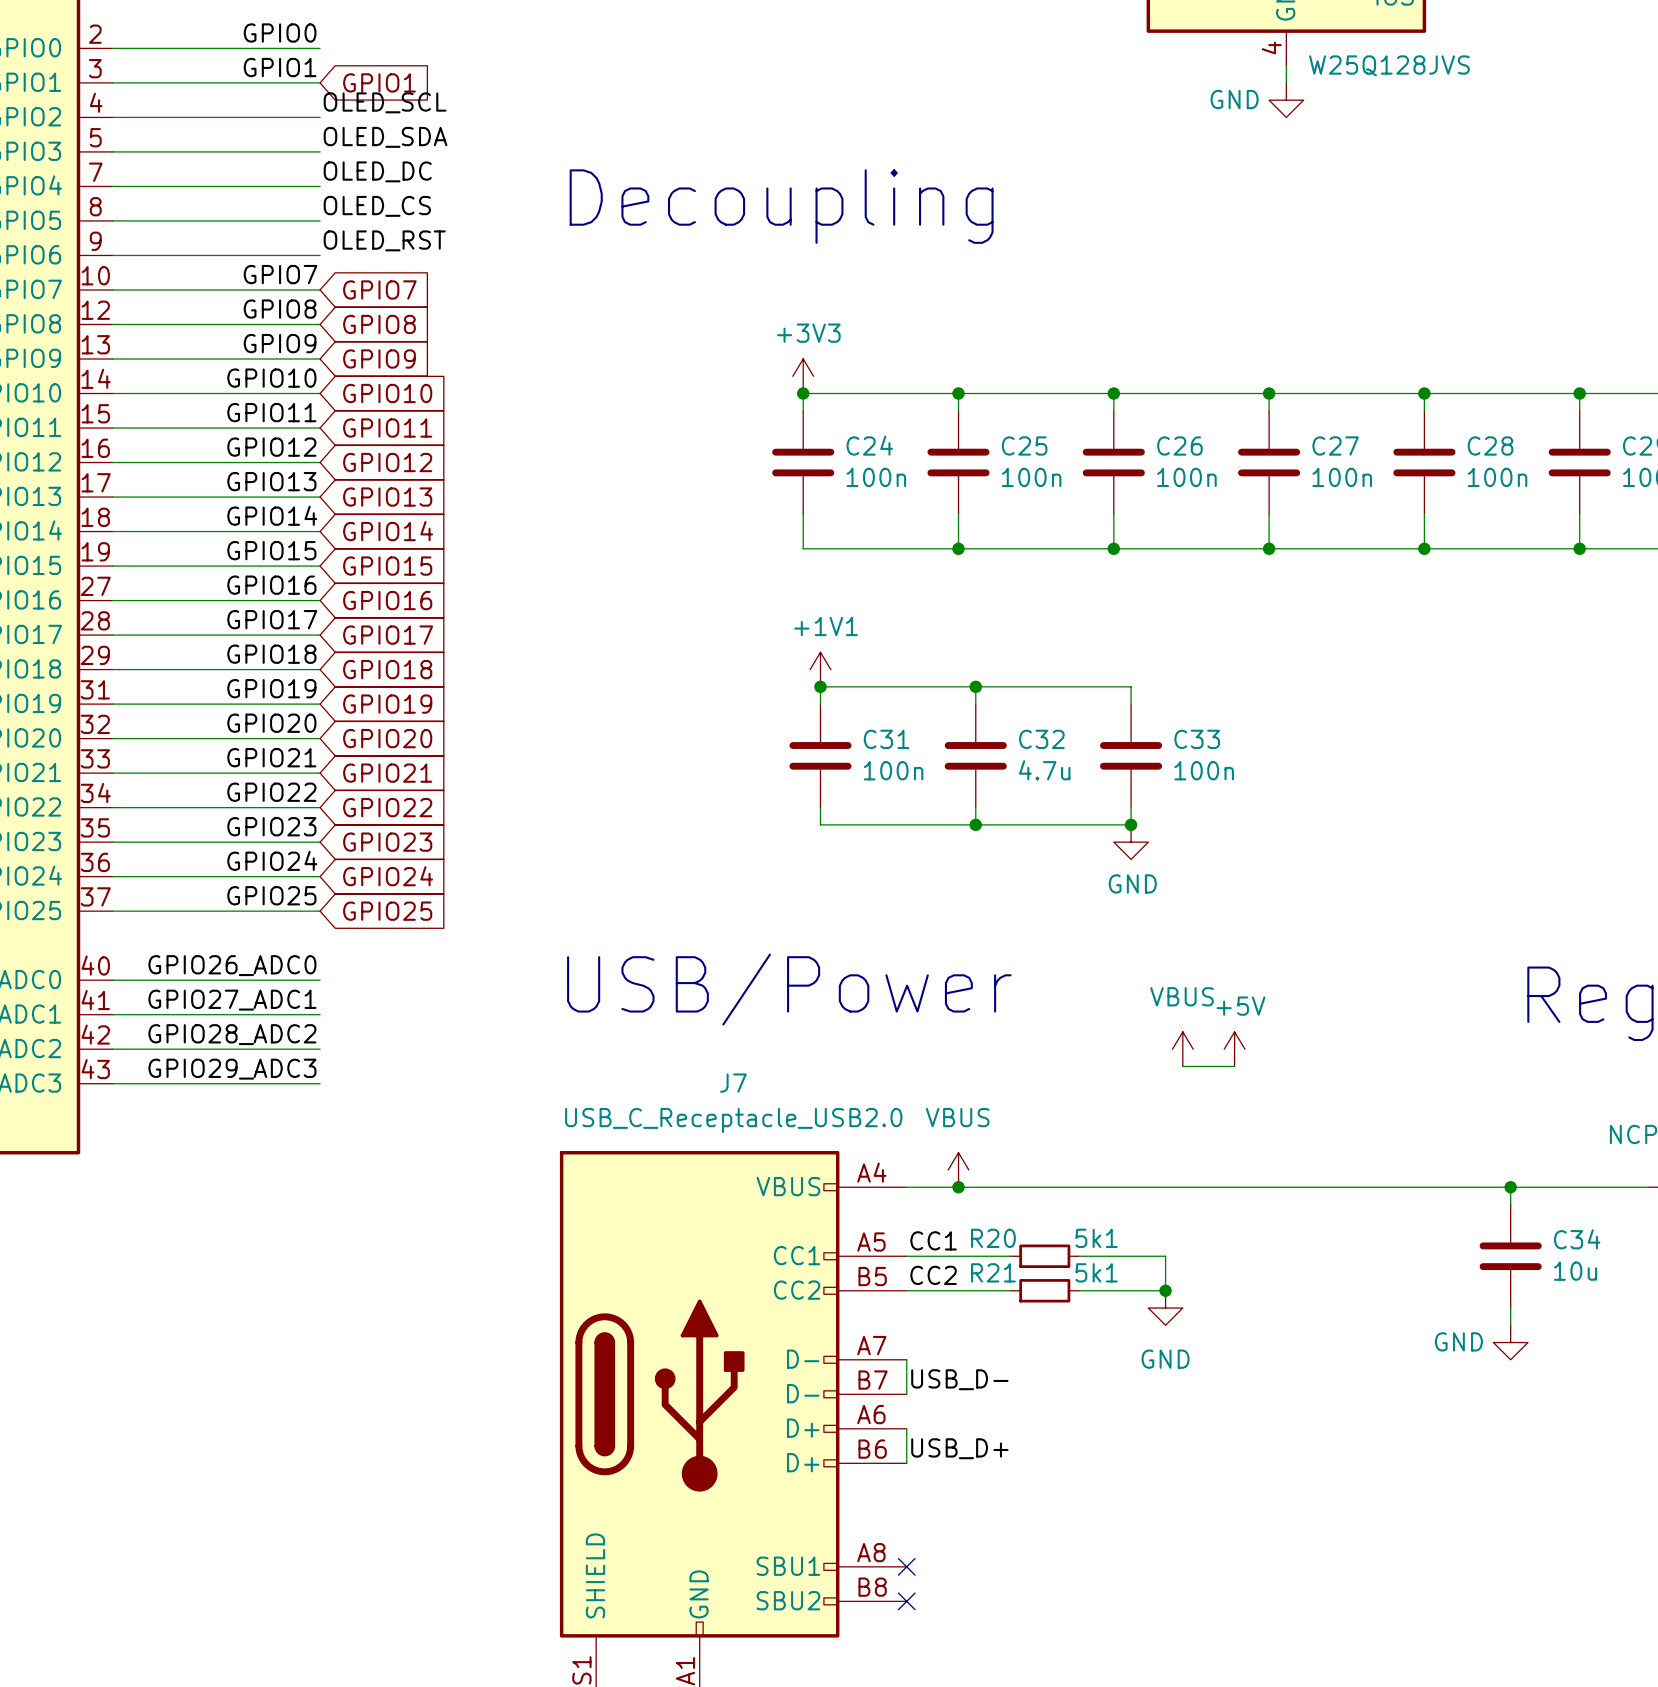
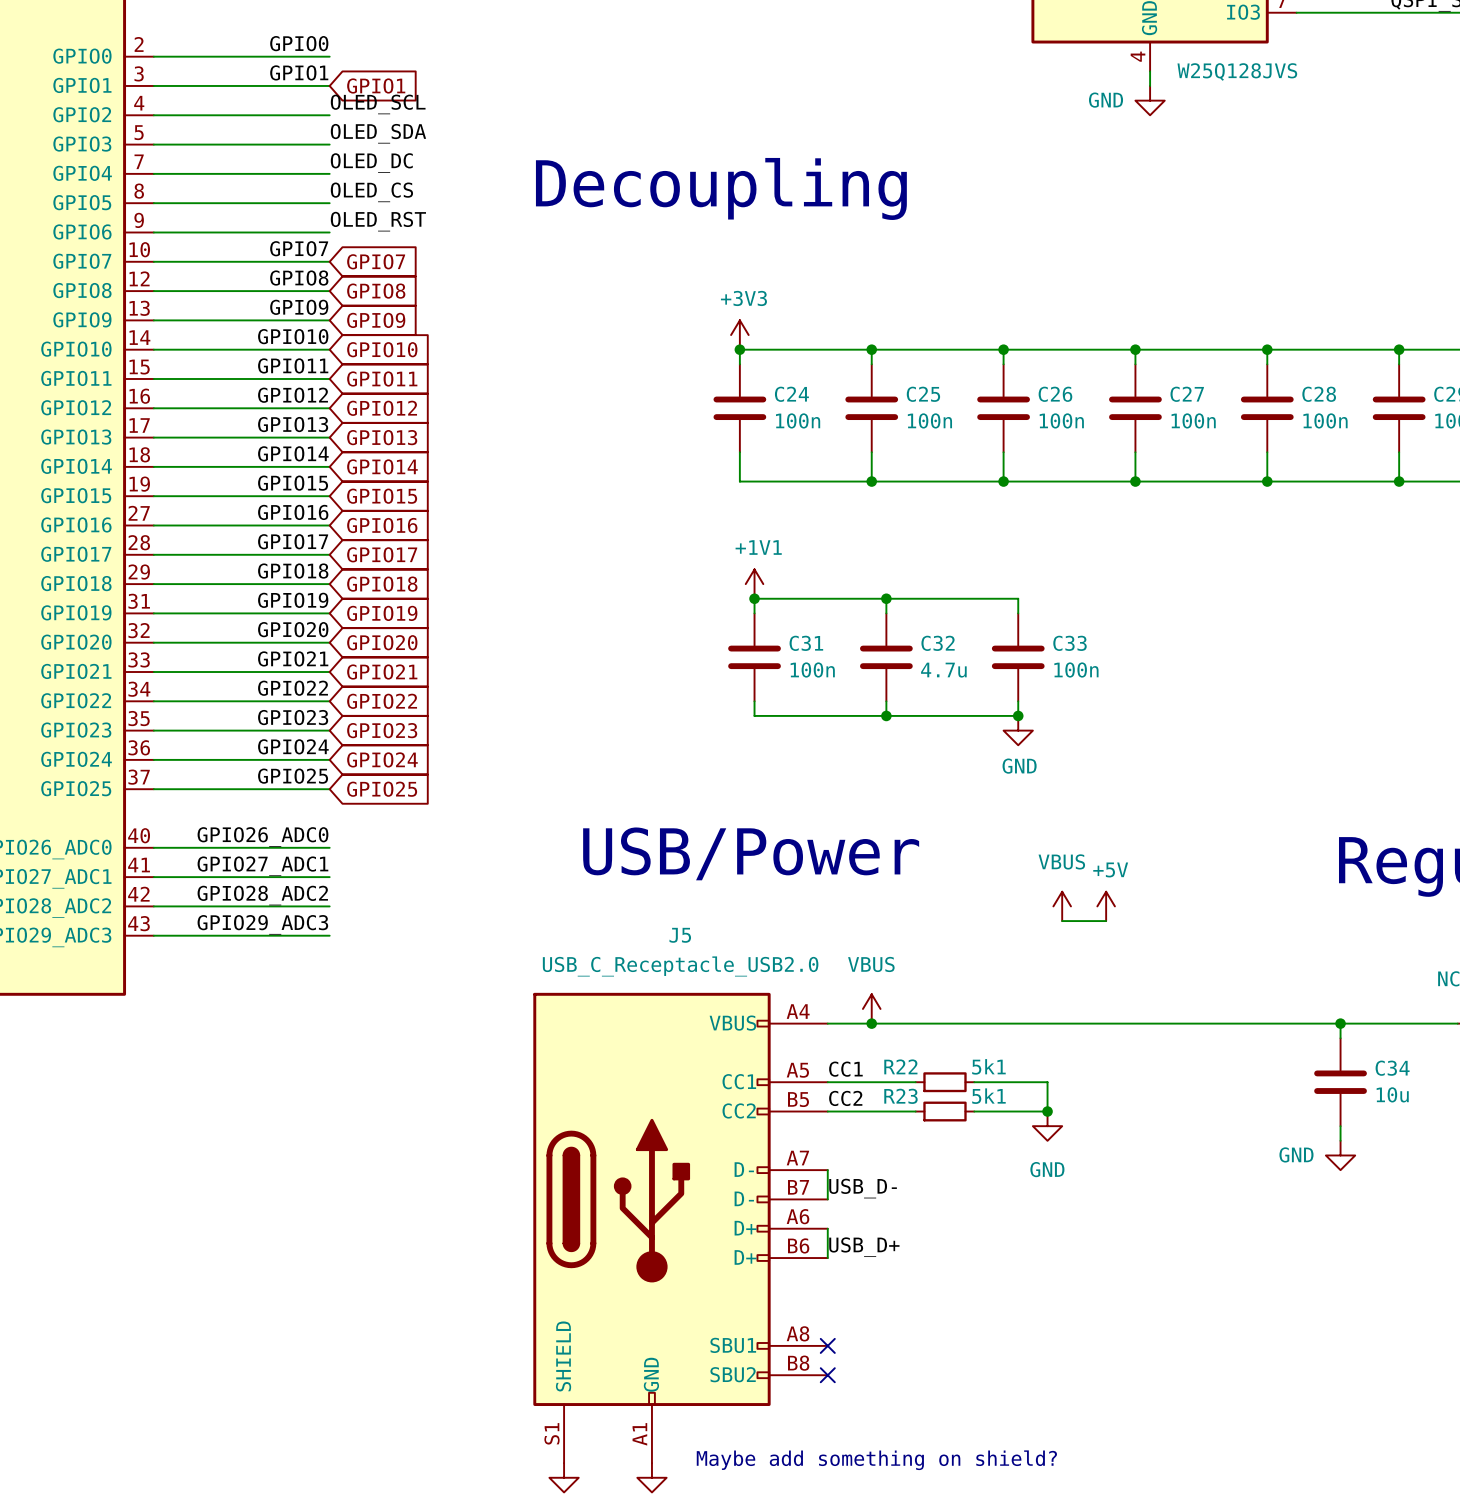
J7 name: J7 (733, 1083) -> J5 (680, 935)
R20 name: R20 (993, 1238) -> R22 (900, 1066)
R21 name: R21 (993, 1272) -> R23 (900, 1096)

